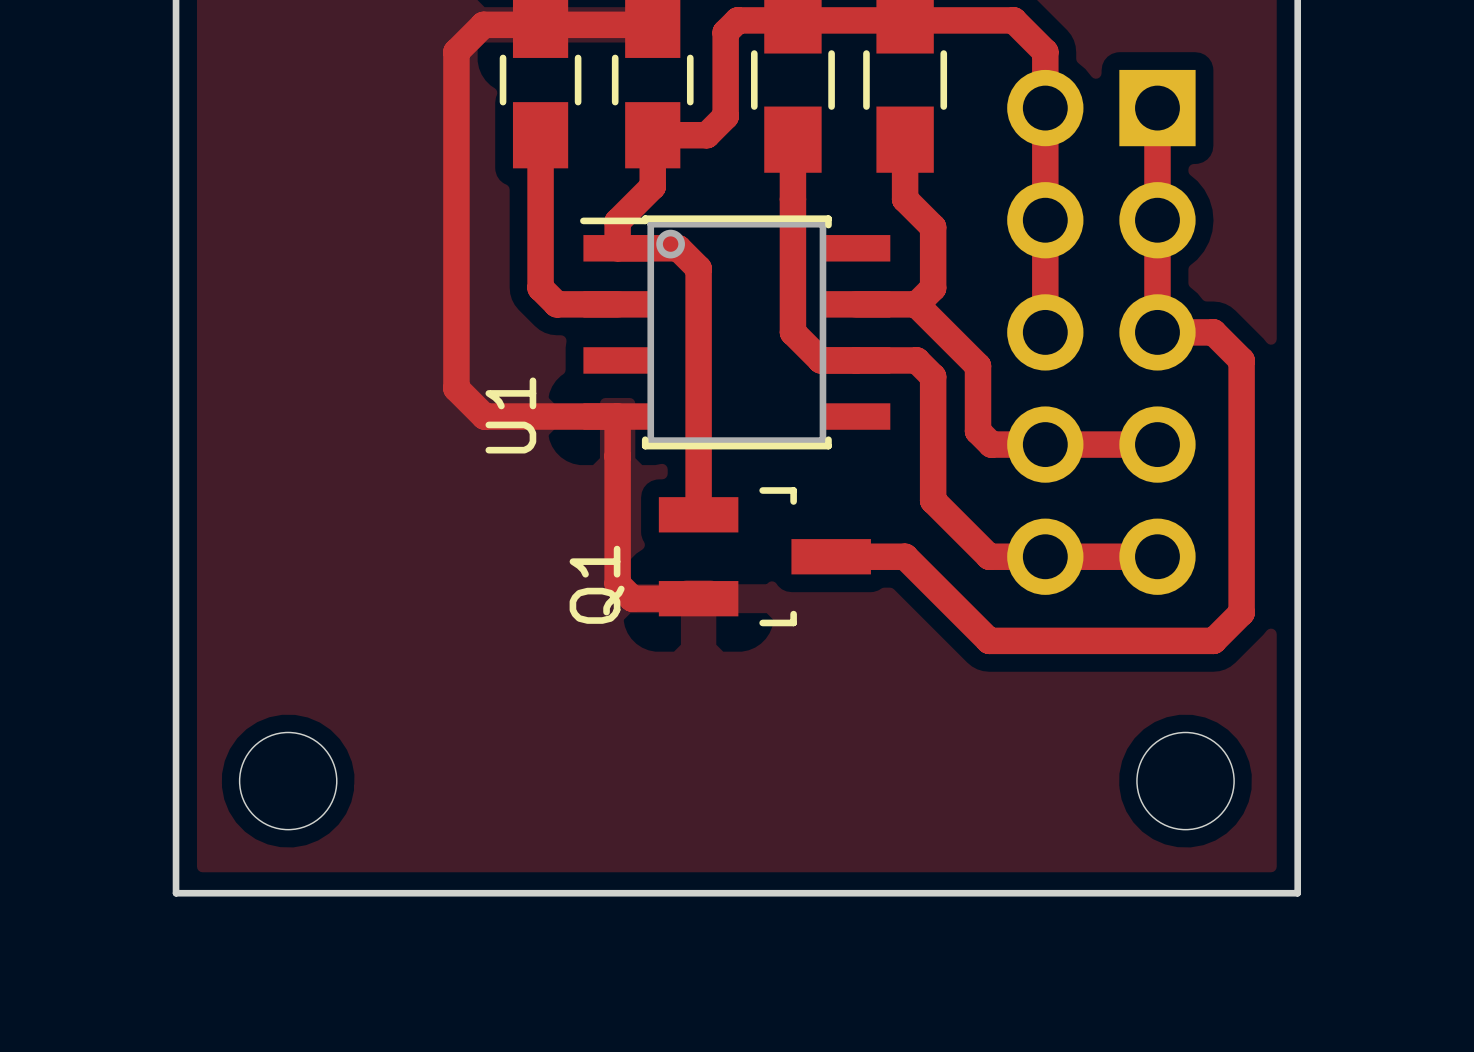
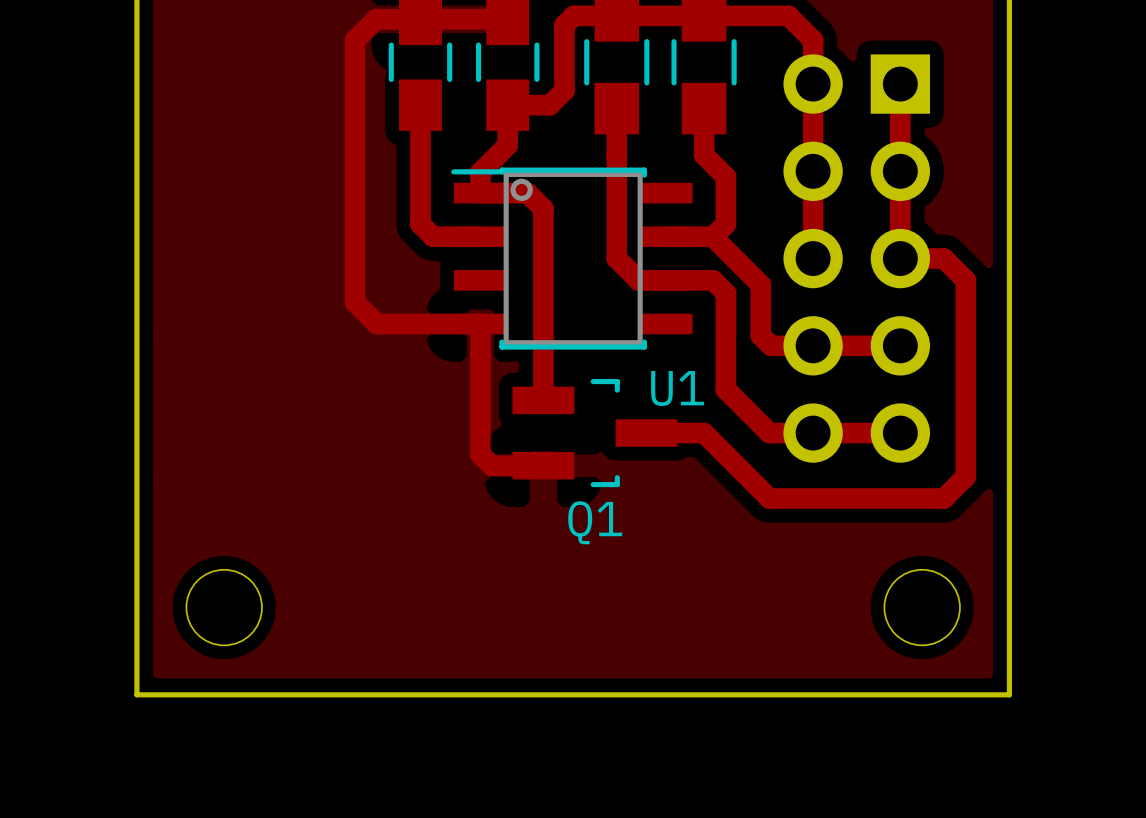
U1 name rotation: 0° (510, 415) -> 90° clockwise (677, 388)
U1 name position: U1 (510, 415) -> U1 (677, 388)
Q1 name rotation: 0° (597, 584) -> 90° clockwise (595, 522)
Q1 name position: Q1 (597, 584) -> Q1 (595, 522)

